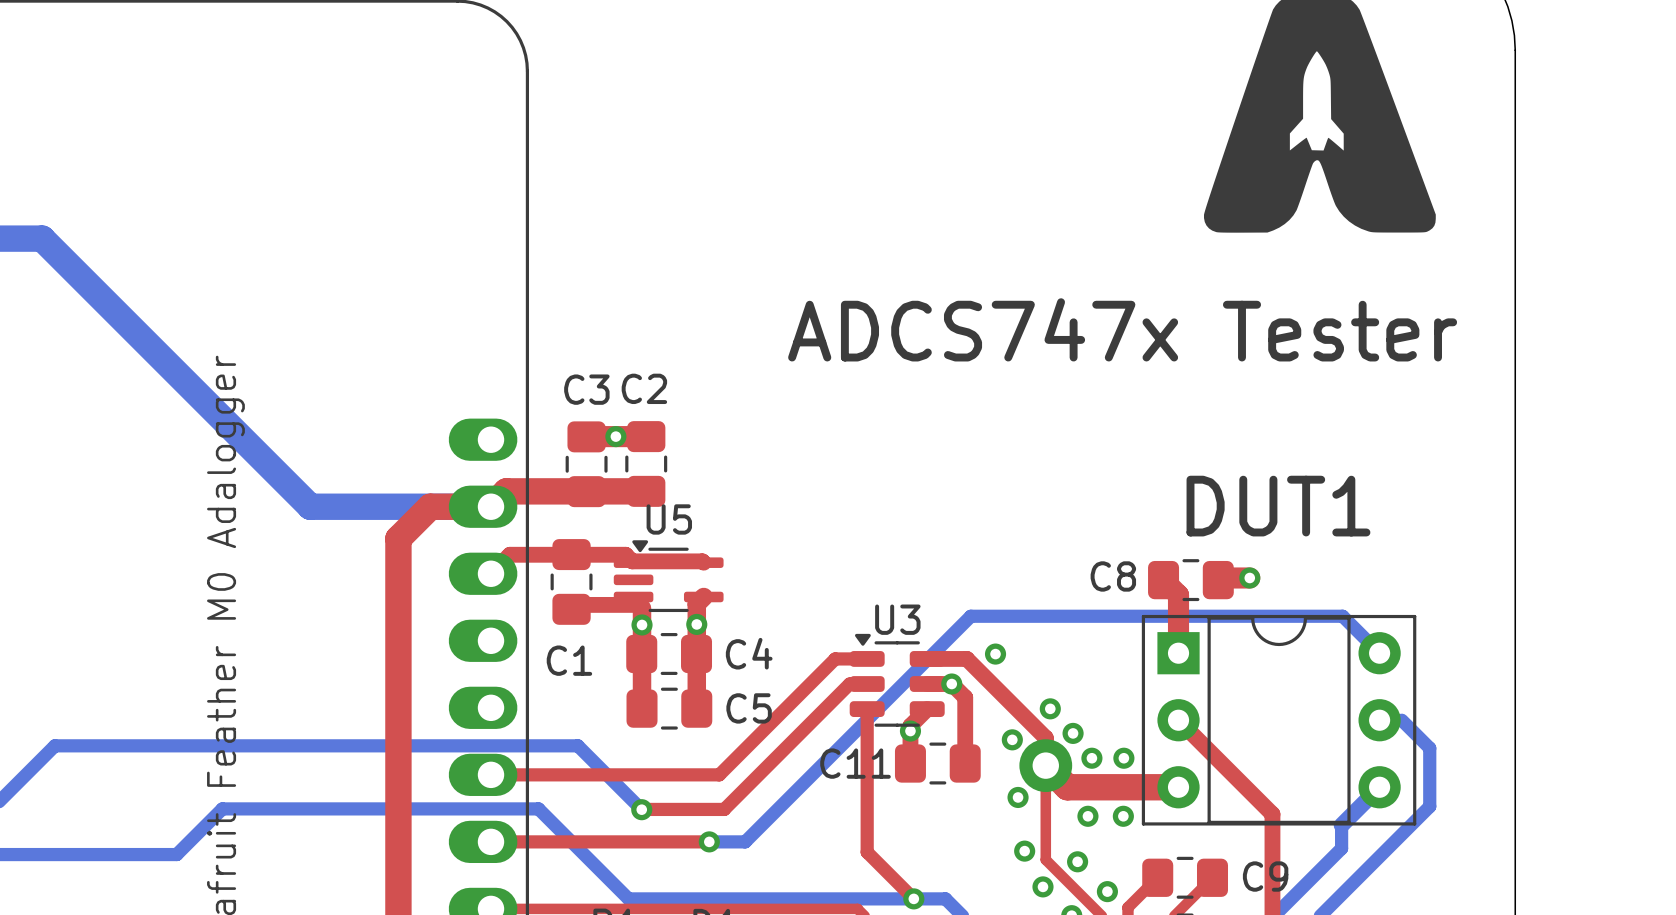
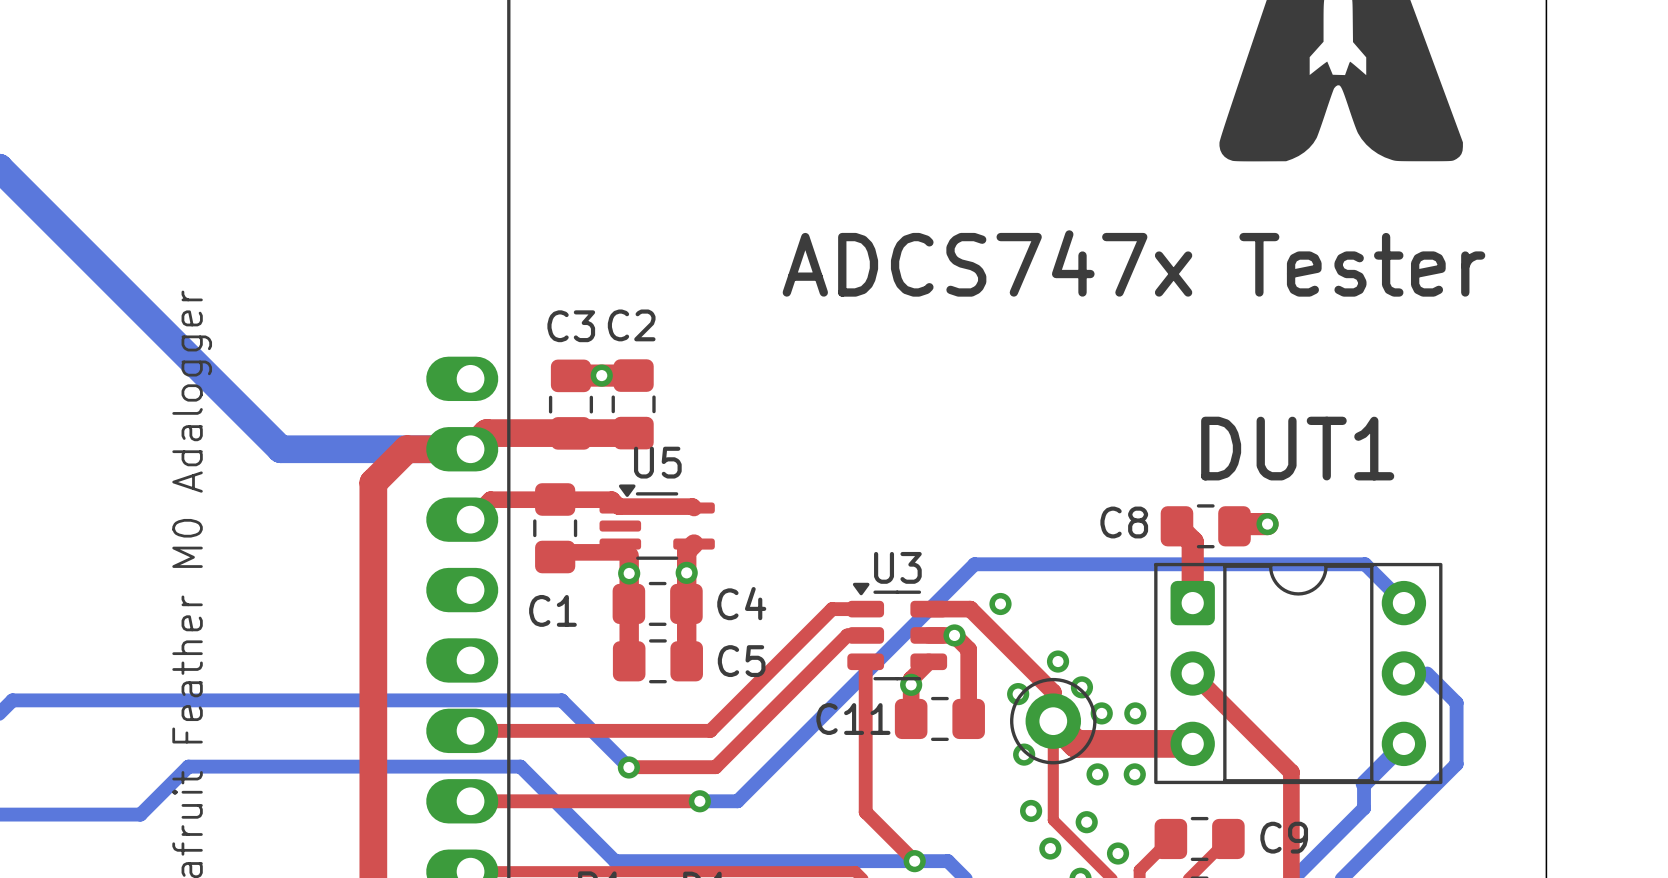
DUT1 footprint: [1141, 614, 1417, 826] -> [1154, 562, 1443, 785]
part footprint: [1019, 739, 1073, 793] -> [1010, 677, 1097, 765]

